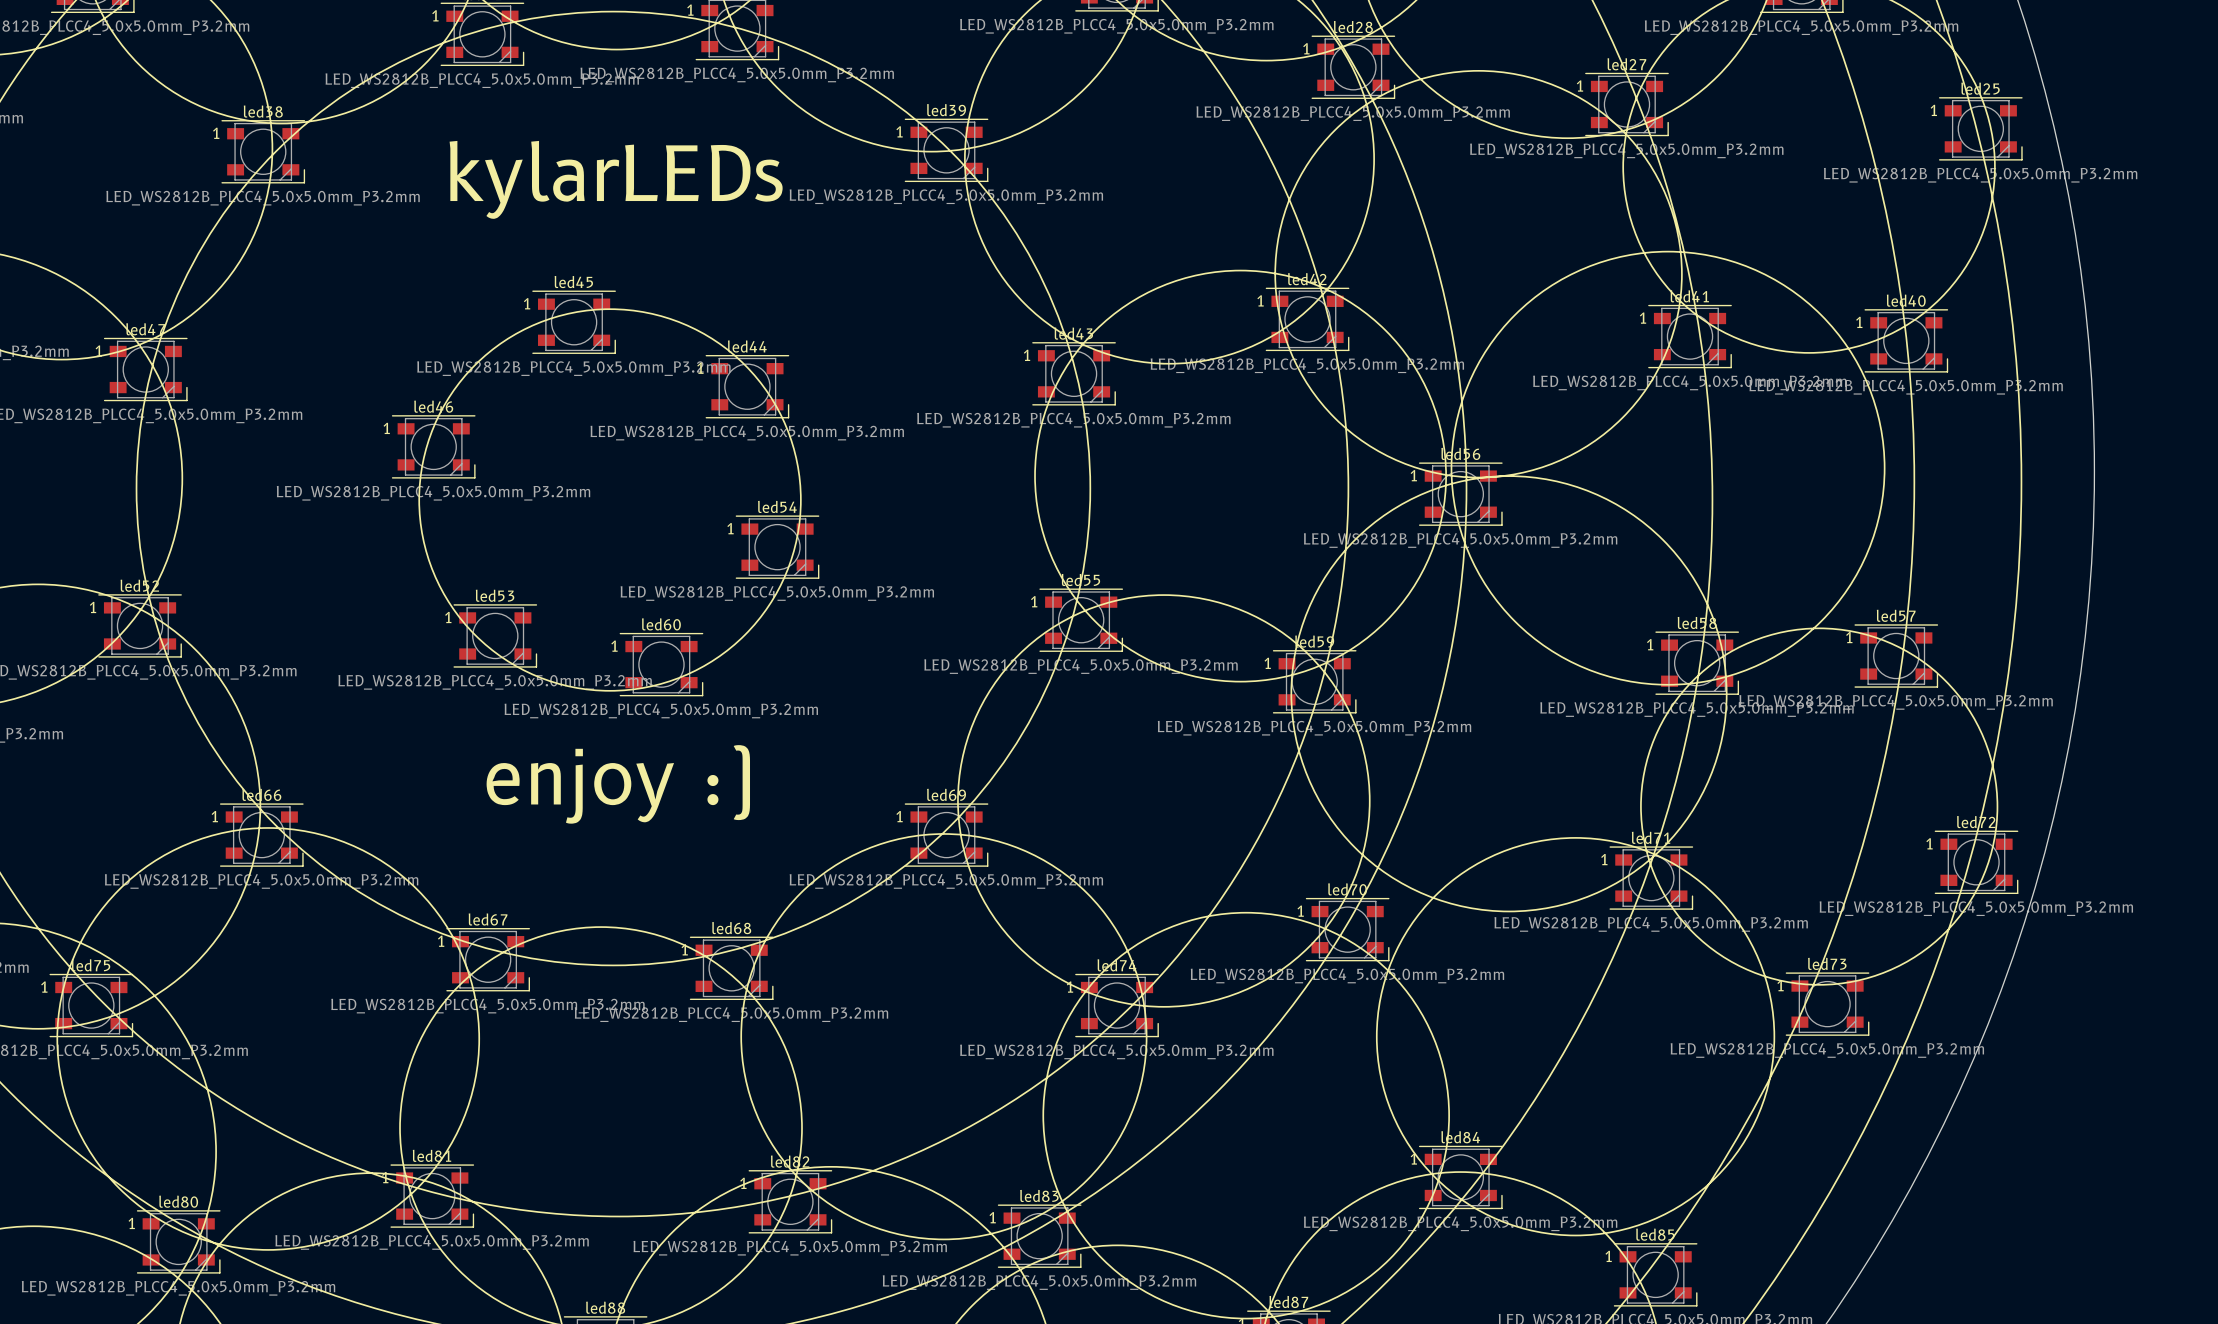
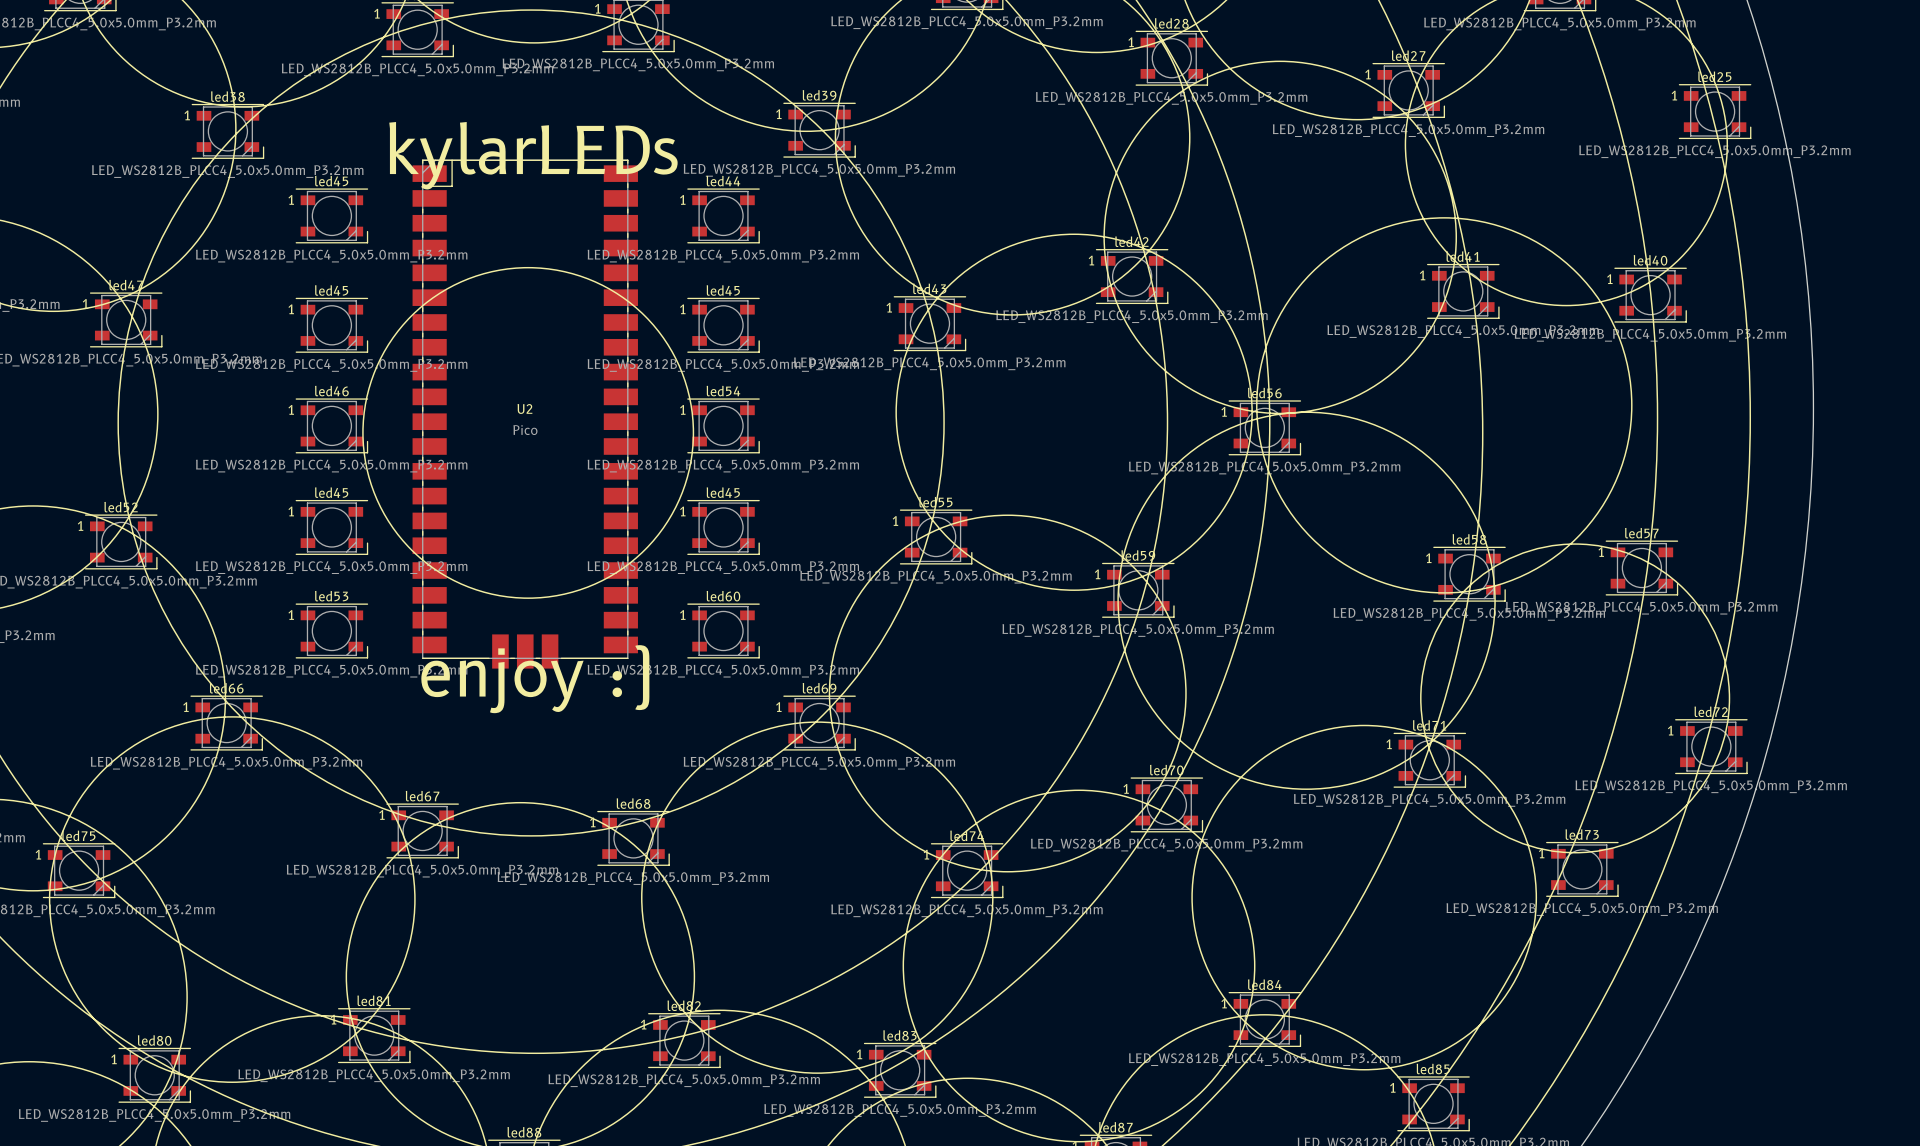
led45: none -> LED_WS2812B_PLCC4_5.0x5.0mm_P3.2mm (331, 215)
led45: LED_WS2812B_PLCC4_5.0x5.0mm_P3.2mm (574, 322) -> none
led45: none -> LED_WS2812B_PLCC4_5.0x5.0mm_P3.2mm (331, 325)
led45: none -> LED_WS2812B_PLCC4_5.0x5.0mm_P3.2mm (723, 325)
led44 position: (747, 386) -> (723, 215)
led46 position: (433, 446) -> (331, 425)
U2: none -> Pico (525, 414)
led54 position: (777, 547) -> (723, 425)
led45: none -> LED_WS2812B_PLCC4_5.0x5.0mm_P3.2mm (331, 527)
led45: none -> LED_WS2812B_PLCC4_5.0x5.0mm_P3.2mm (723, 527)
led53 position: (495, 635) -> (331, 630)
led60 position: (661, 664) -> (723, 630)

